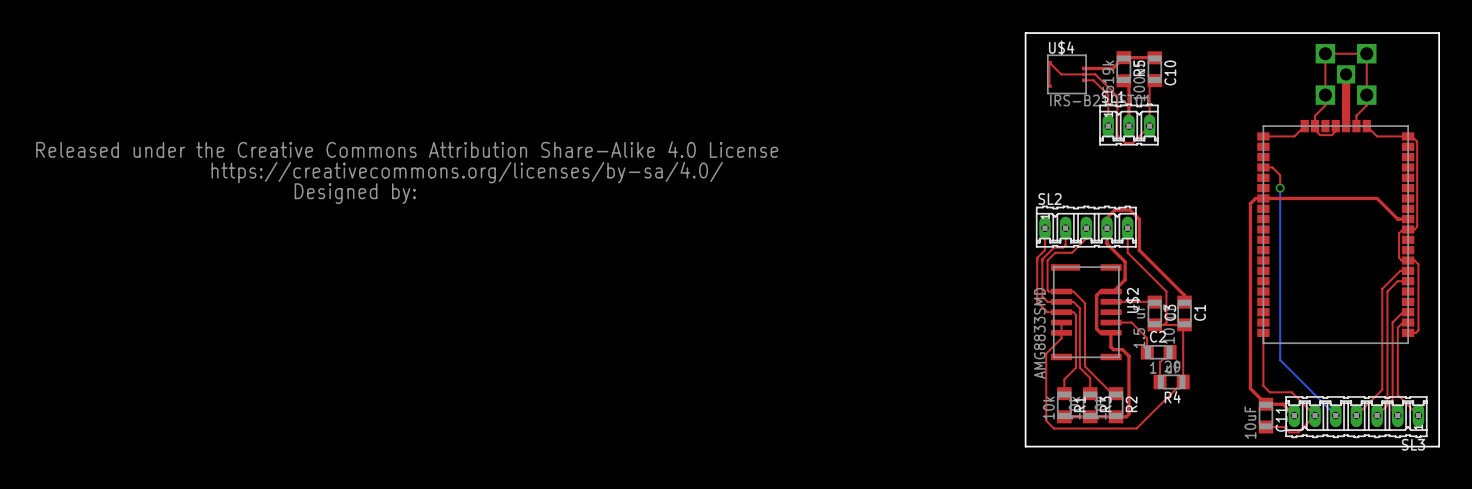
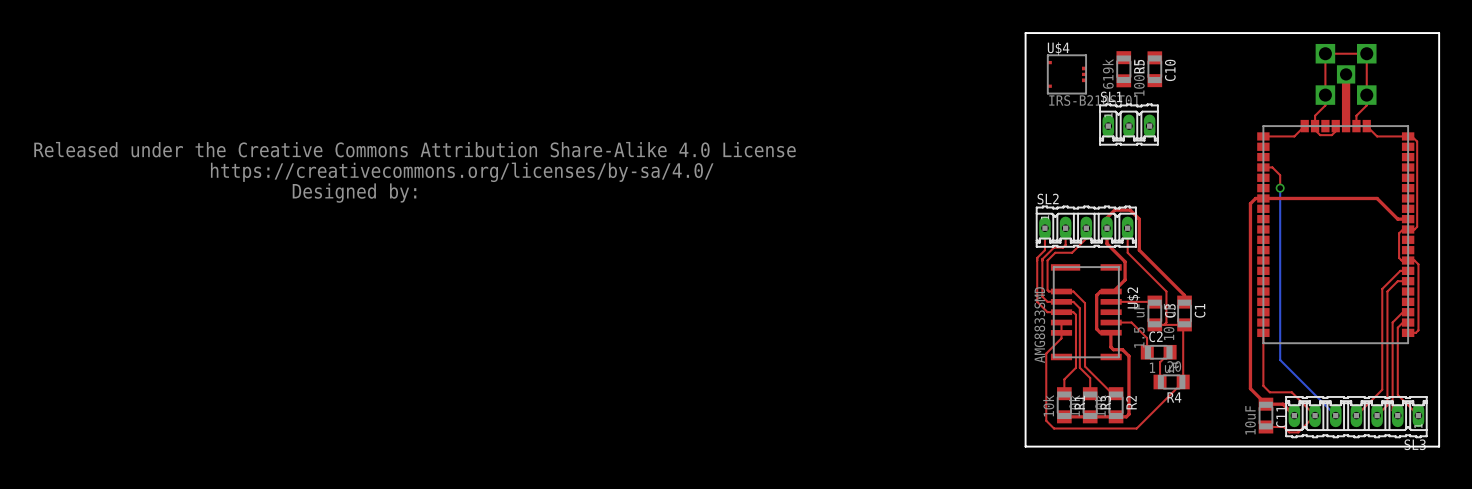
top track: (1154, 57) (1123, 57) (1112, 68) (1084, 68) -> none
top track: (1084, 80) (1093, 80) (1108, 95) (1108, 126) -> none
top track: (1123, 80) (1128, 85) (1128, 126) -> none
top track: (1154, 80) (1149, 85) (1149, 126) (1132, 142) (1125, 142) (1117, 135) (1117, 96) (1095, 74) (1061, 74) (1049, 62) (1049, 86) -> none

